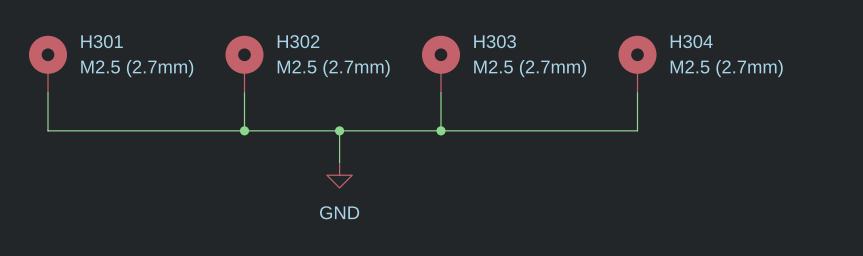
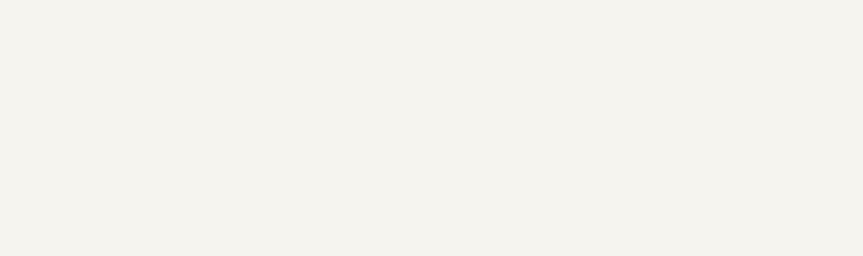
H301: M2.5 (2.7mm) (48, 64) -> none
H302: M2.5 (2.7mm) (244, 64) -> none
H303: M2.5 (2.7mm) (440, 64) -> none
H304: M2.5 (2.7mm) (637, 64) -> none
wire: (48, 92) (48, 130) (637, 130) (637, 92) -> none
wire: (244, 92) (244, 130) -> none
wire: (440, 92) (440, 130) -> none
junction: (244, 130) -> none
wire: (339, 130) (339, 162) -> none
junction: (339, 130) -> none
junction: (440, 130) -> none
power symbol: GND (339, 175) -> none

